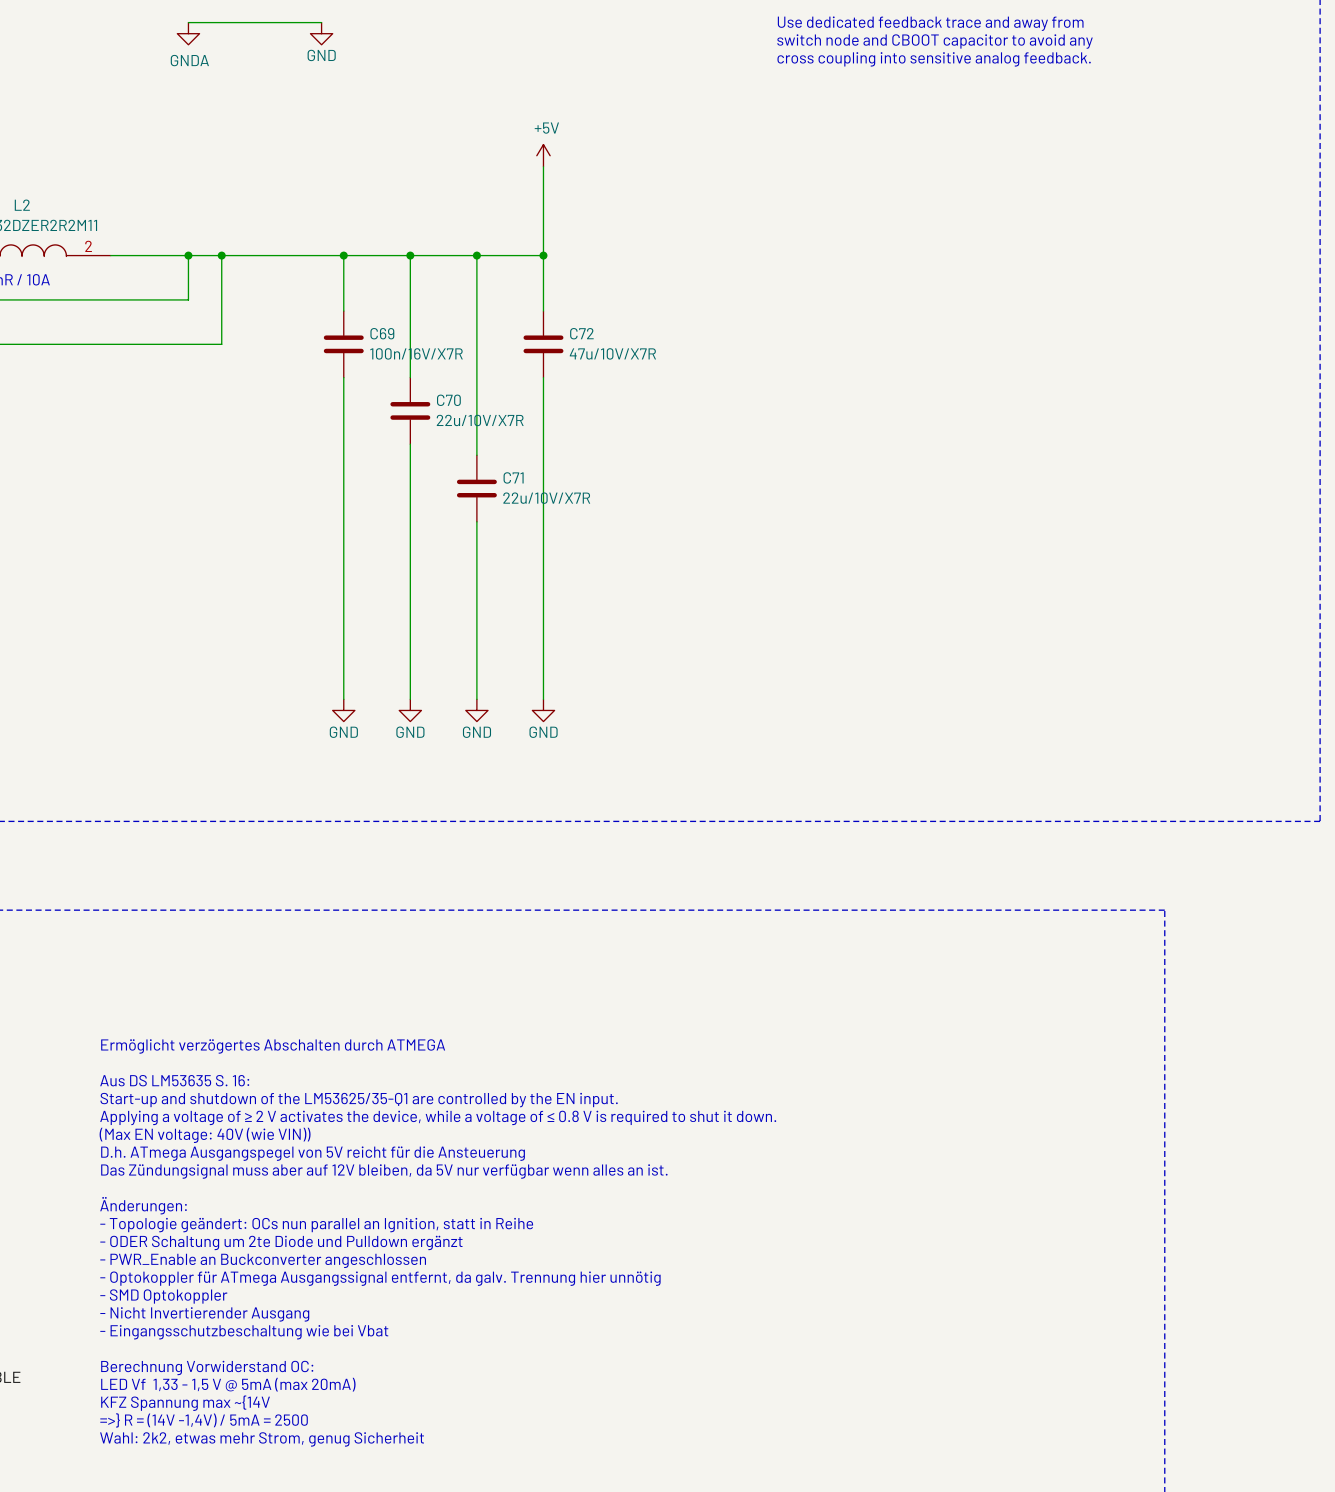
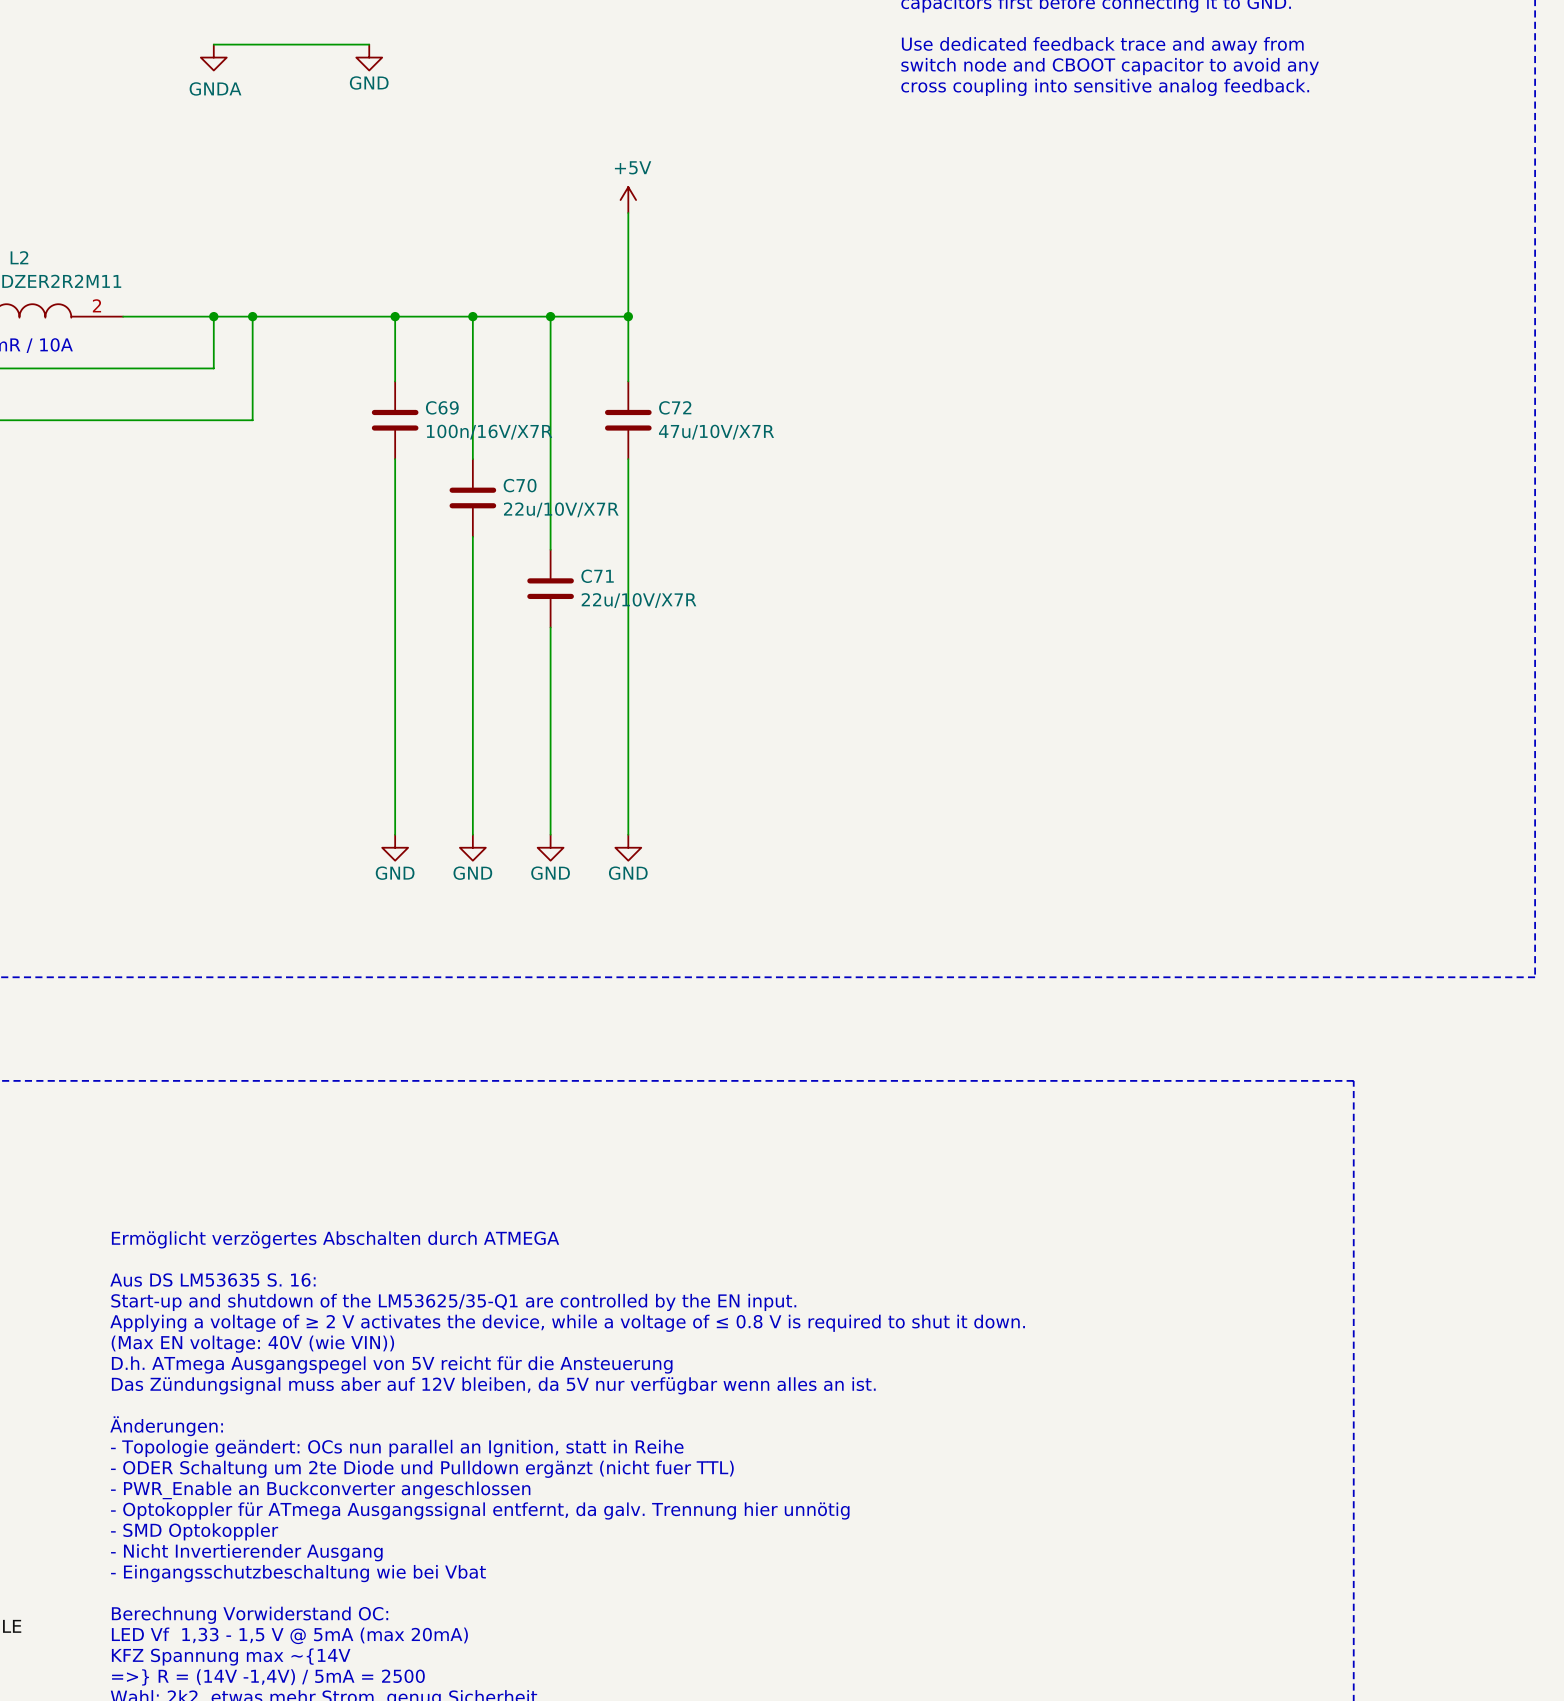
text: - ODER Schaltung um 2te Diode und Pulldown ergänzt (281, 1242) -> - ODER Schaltung um 2te Diode und Pulldown ergänzt (nicht fuer TTL) (422, 1469)

